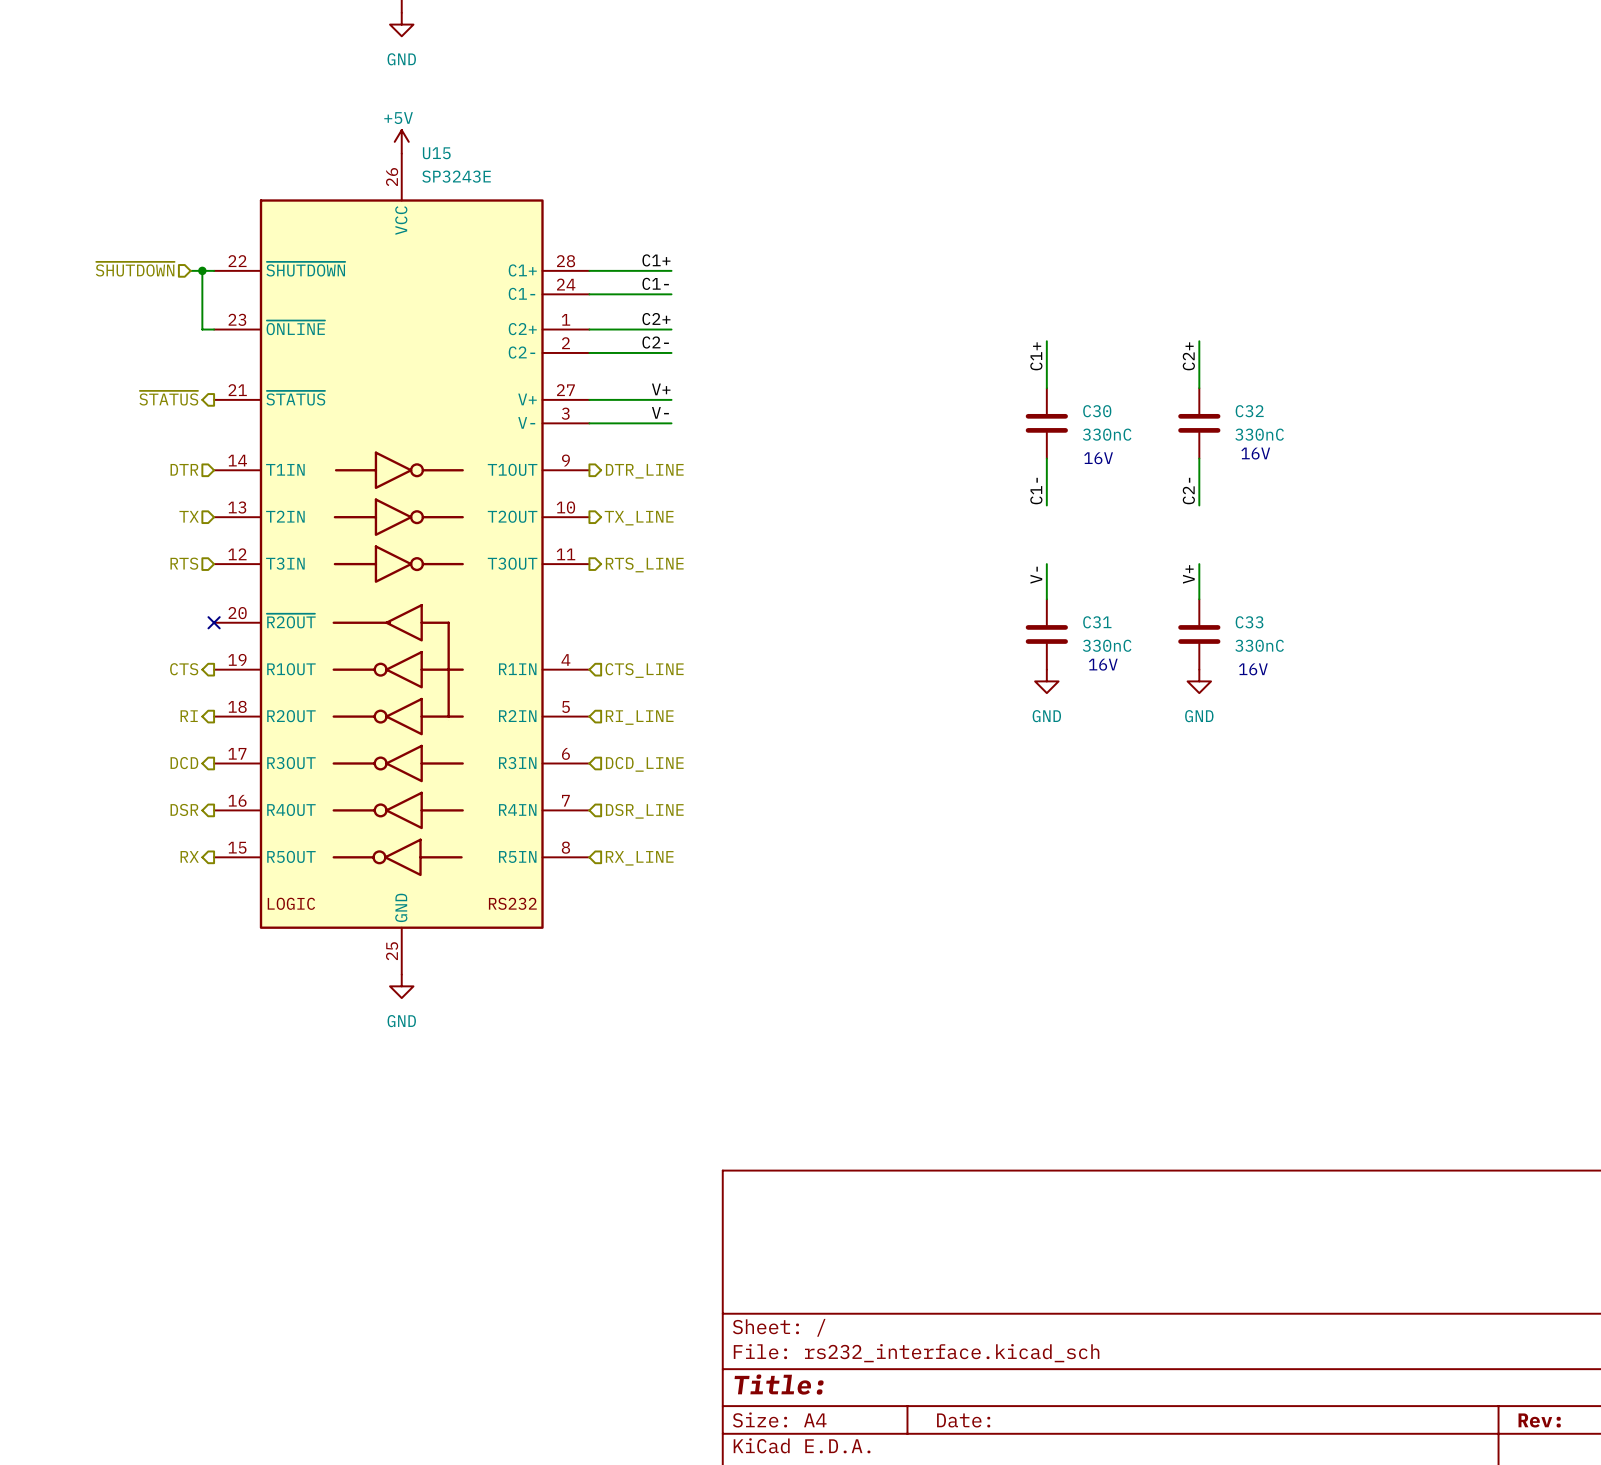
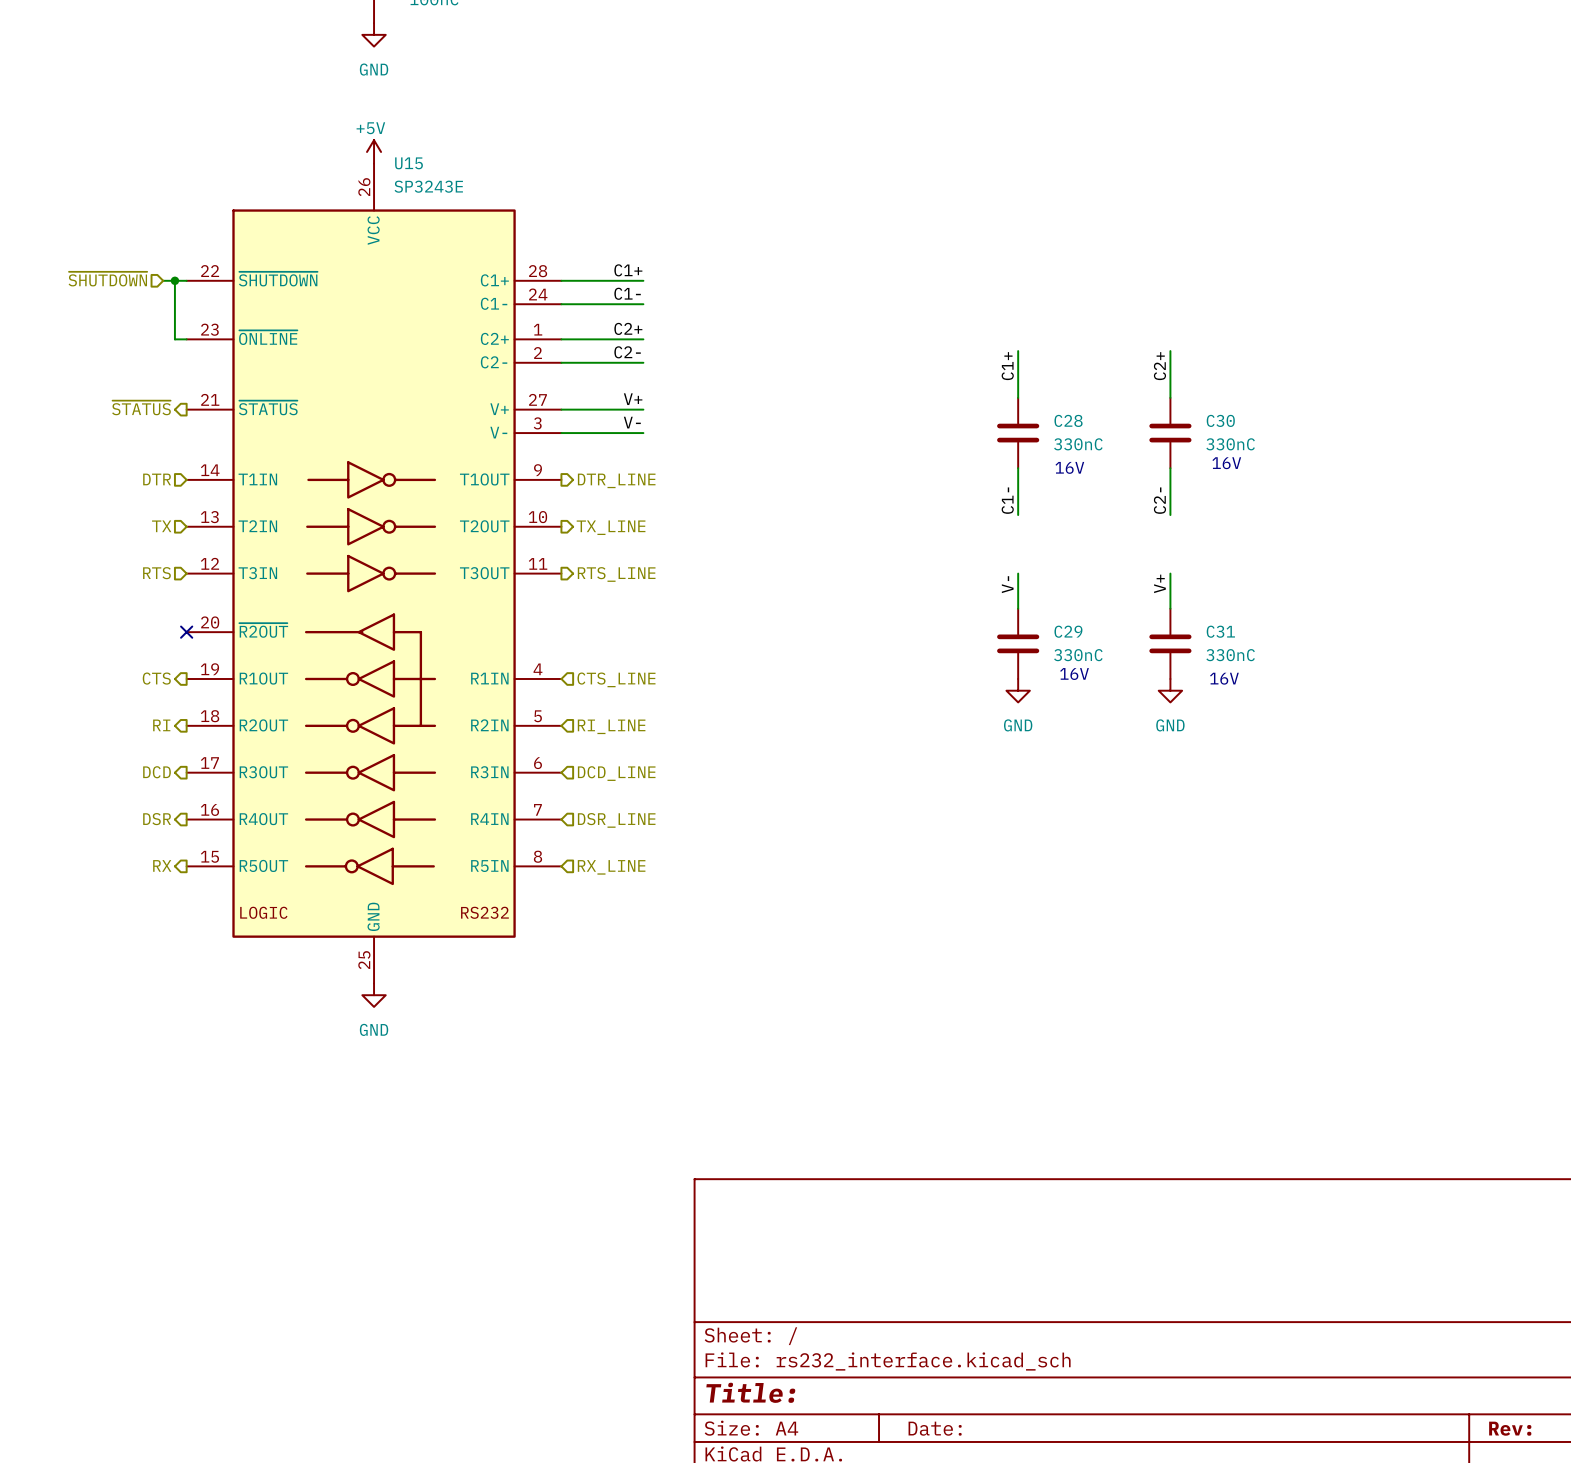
C30 name: C30 (1097, 411) -> C28 (1068, 420)
C32 name: C32 (1249, 411) -> C30 (1220, 420)
C31 name: C31 (1097, 622) -> C29 (1068, 631)
C33 name: C33 (1249, 622) -> C31 (1220, 631)

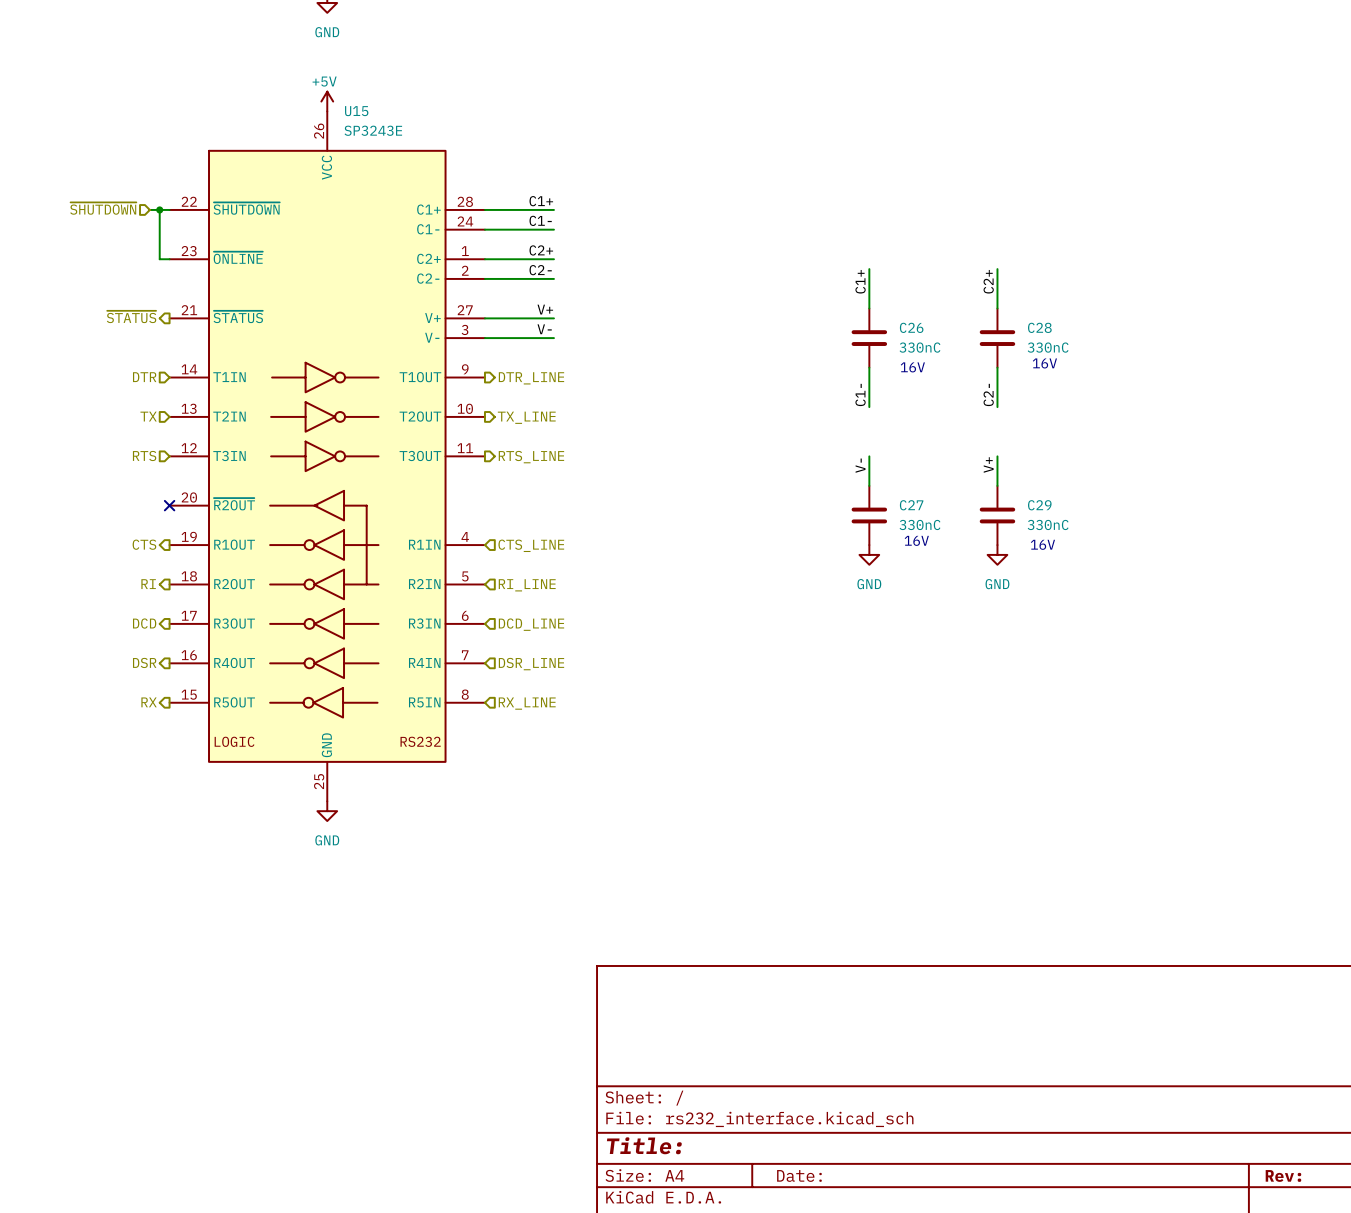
C28 name: C28 (1068, 420) -> C26 (911, 327)
C30 name: C30 (1220, 420) -> C28 (1039, 327)
C29 name: C29 (1068, 631) -> C27 (911, 505)
C31 name: C31 (1220, 631) -> C29 (1039, 505)

